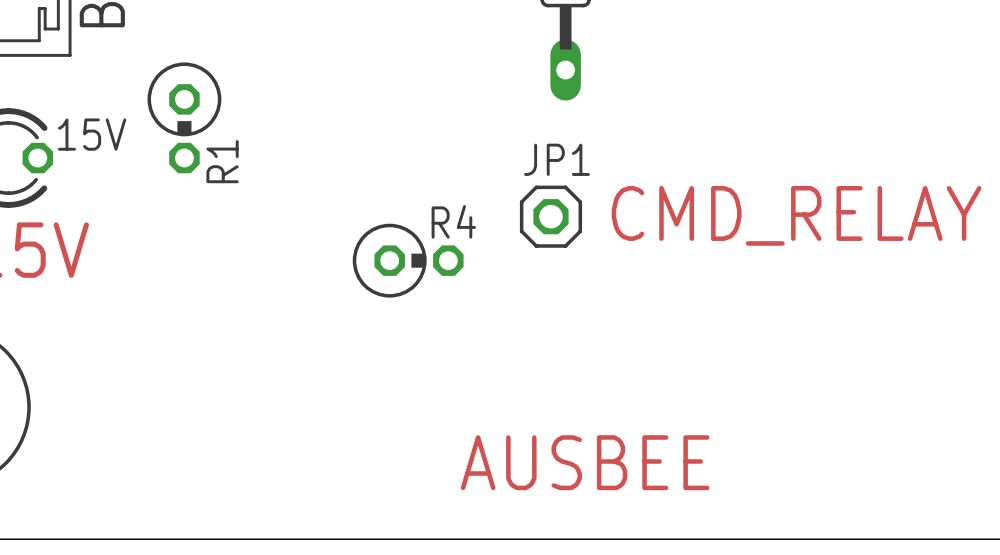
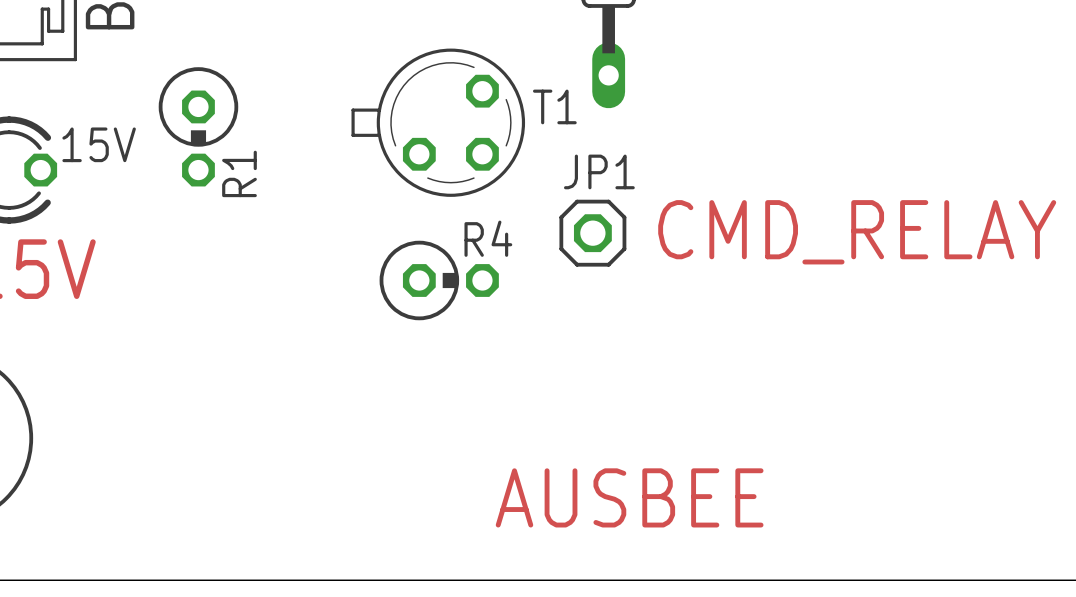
T1: none -> (438, 122)

